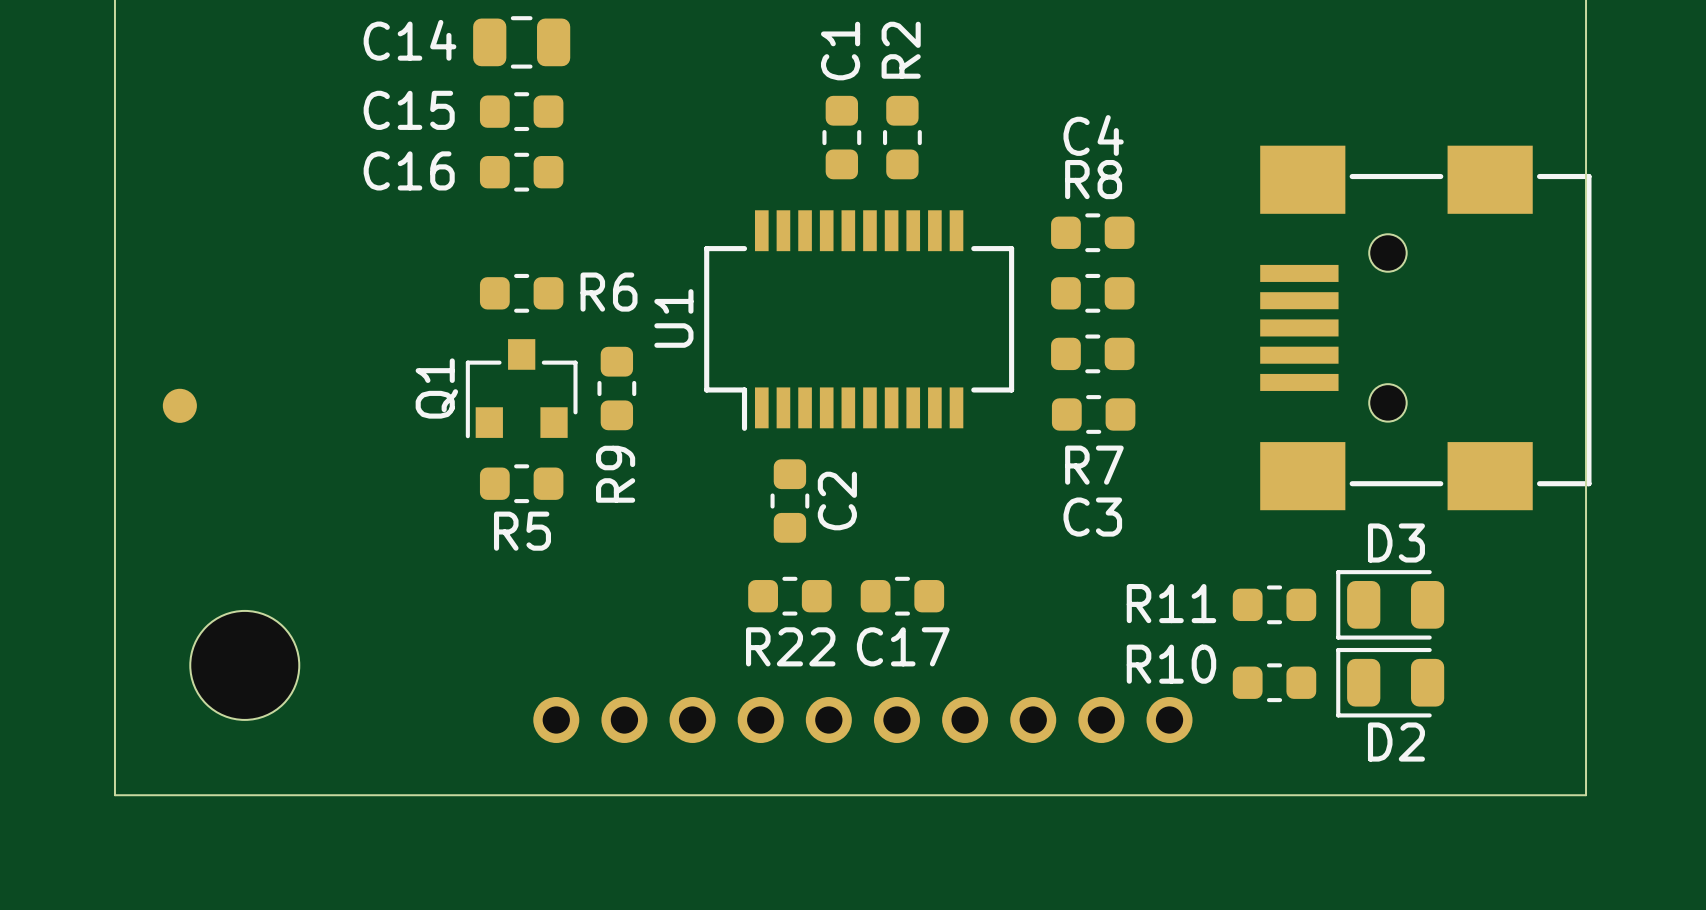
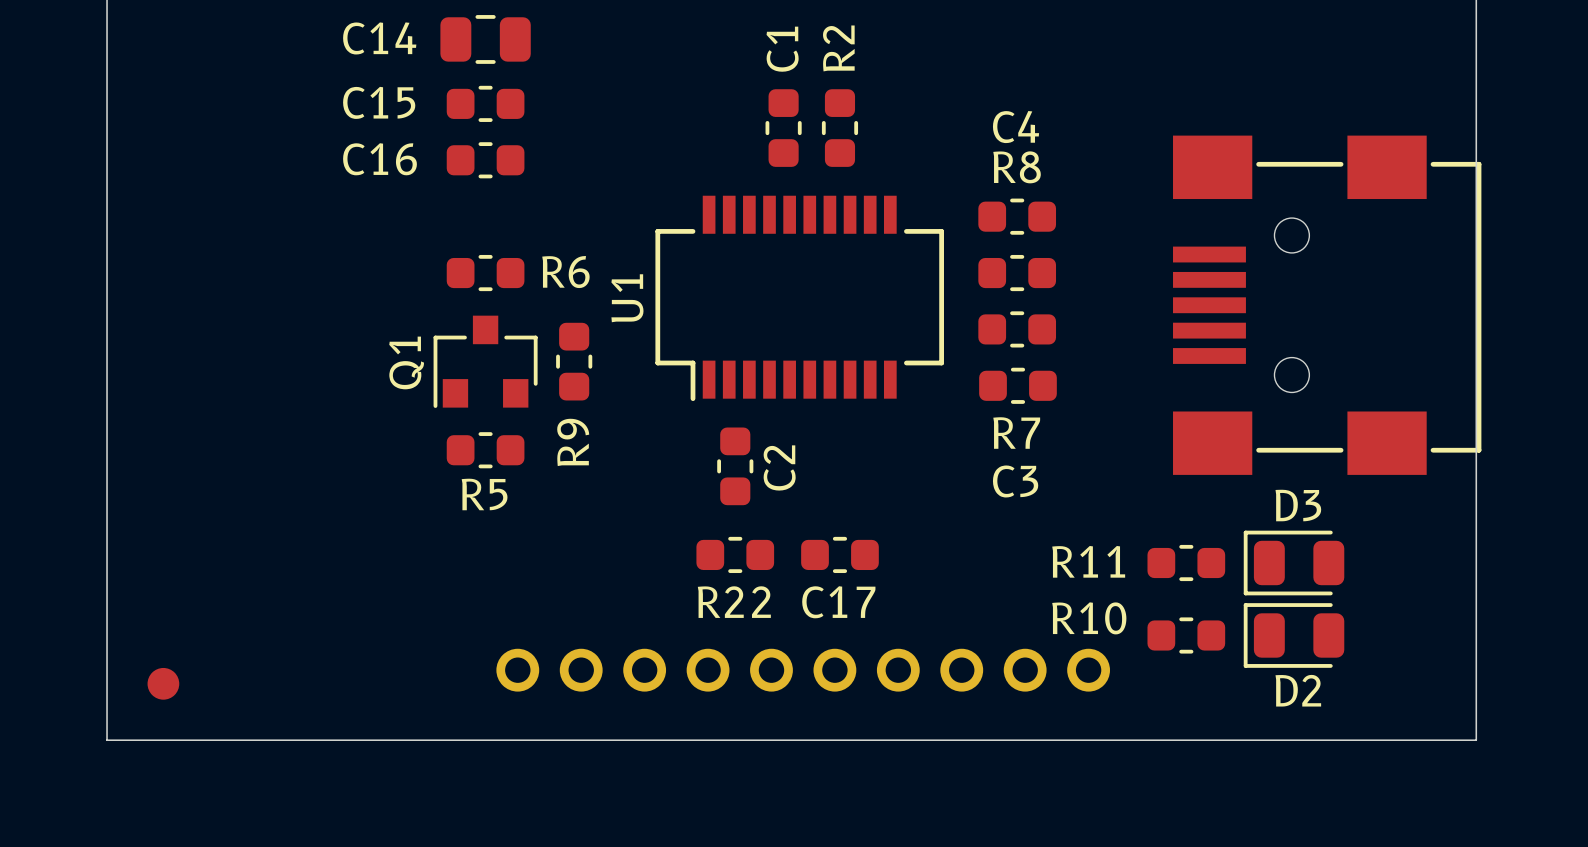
part position: (179, 405) -> (163, 683)
part: (244, 665) -> none

